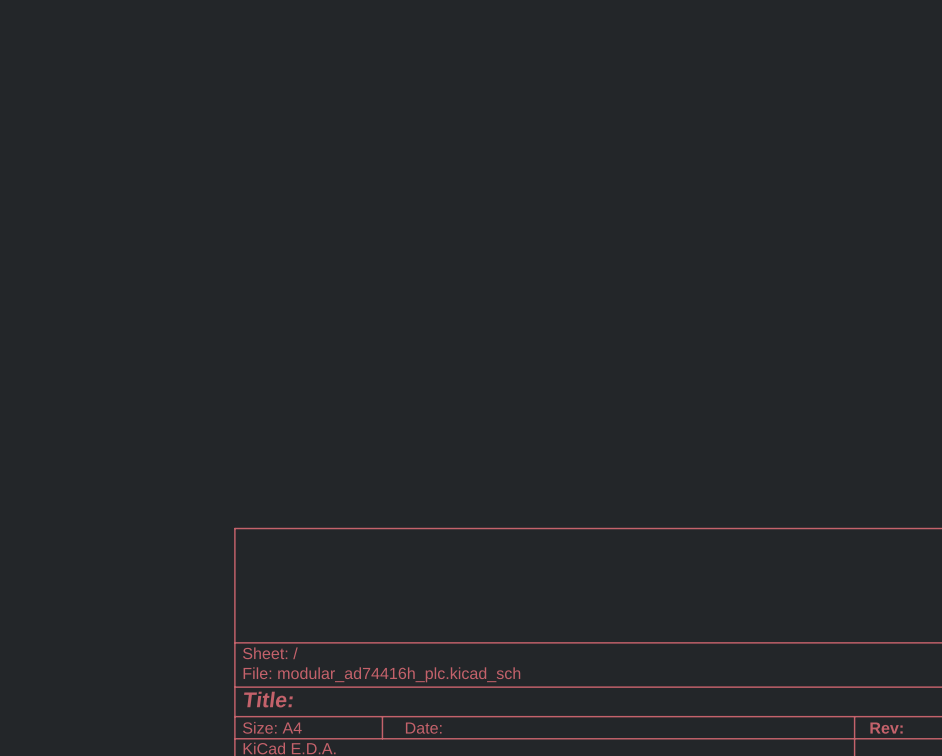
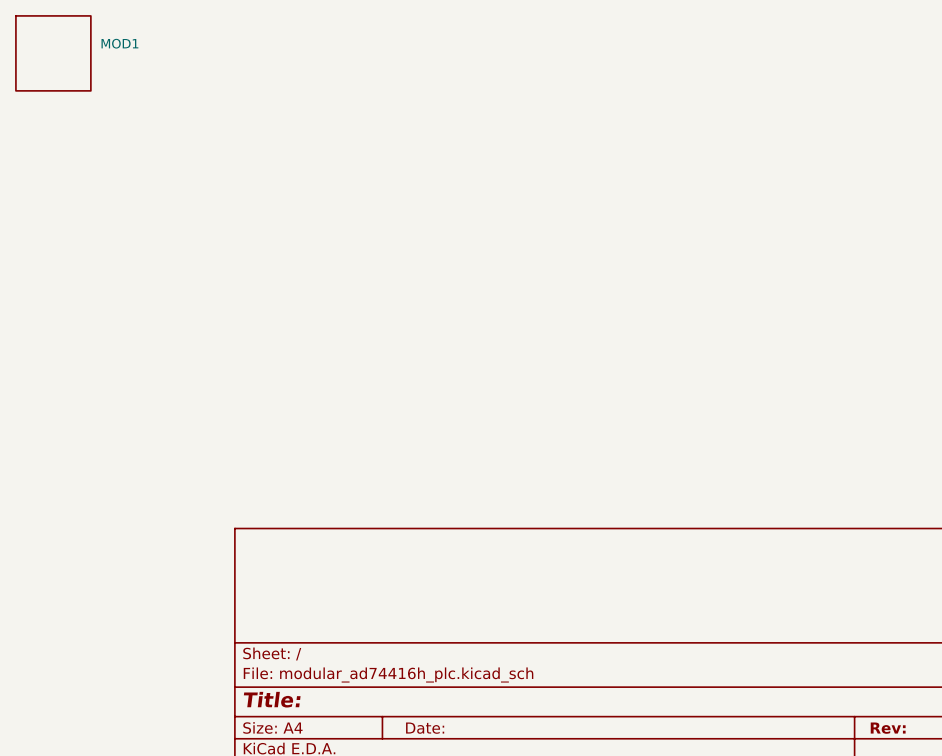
MOD1: none -> (53, 53)

